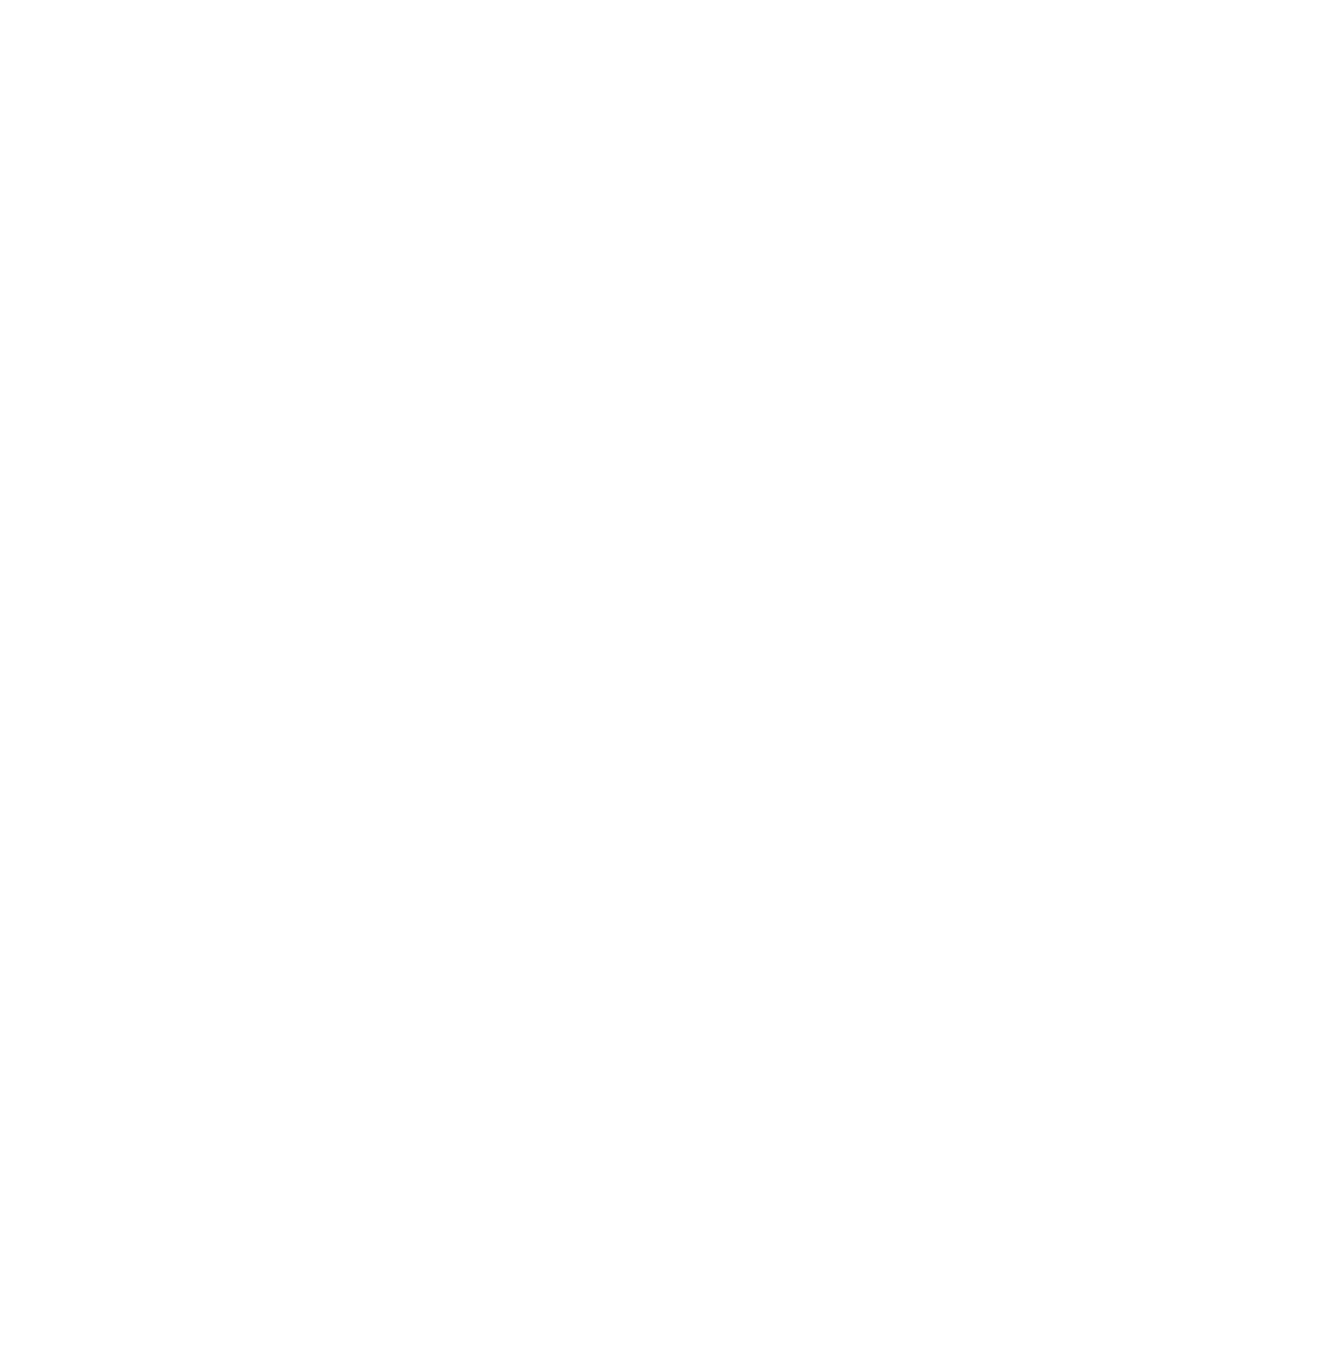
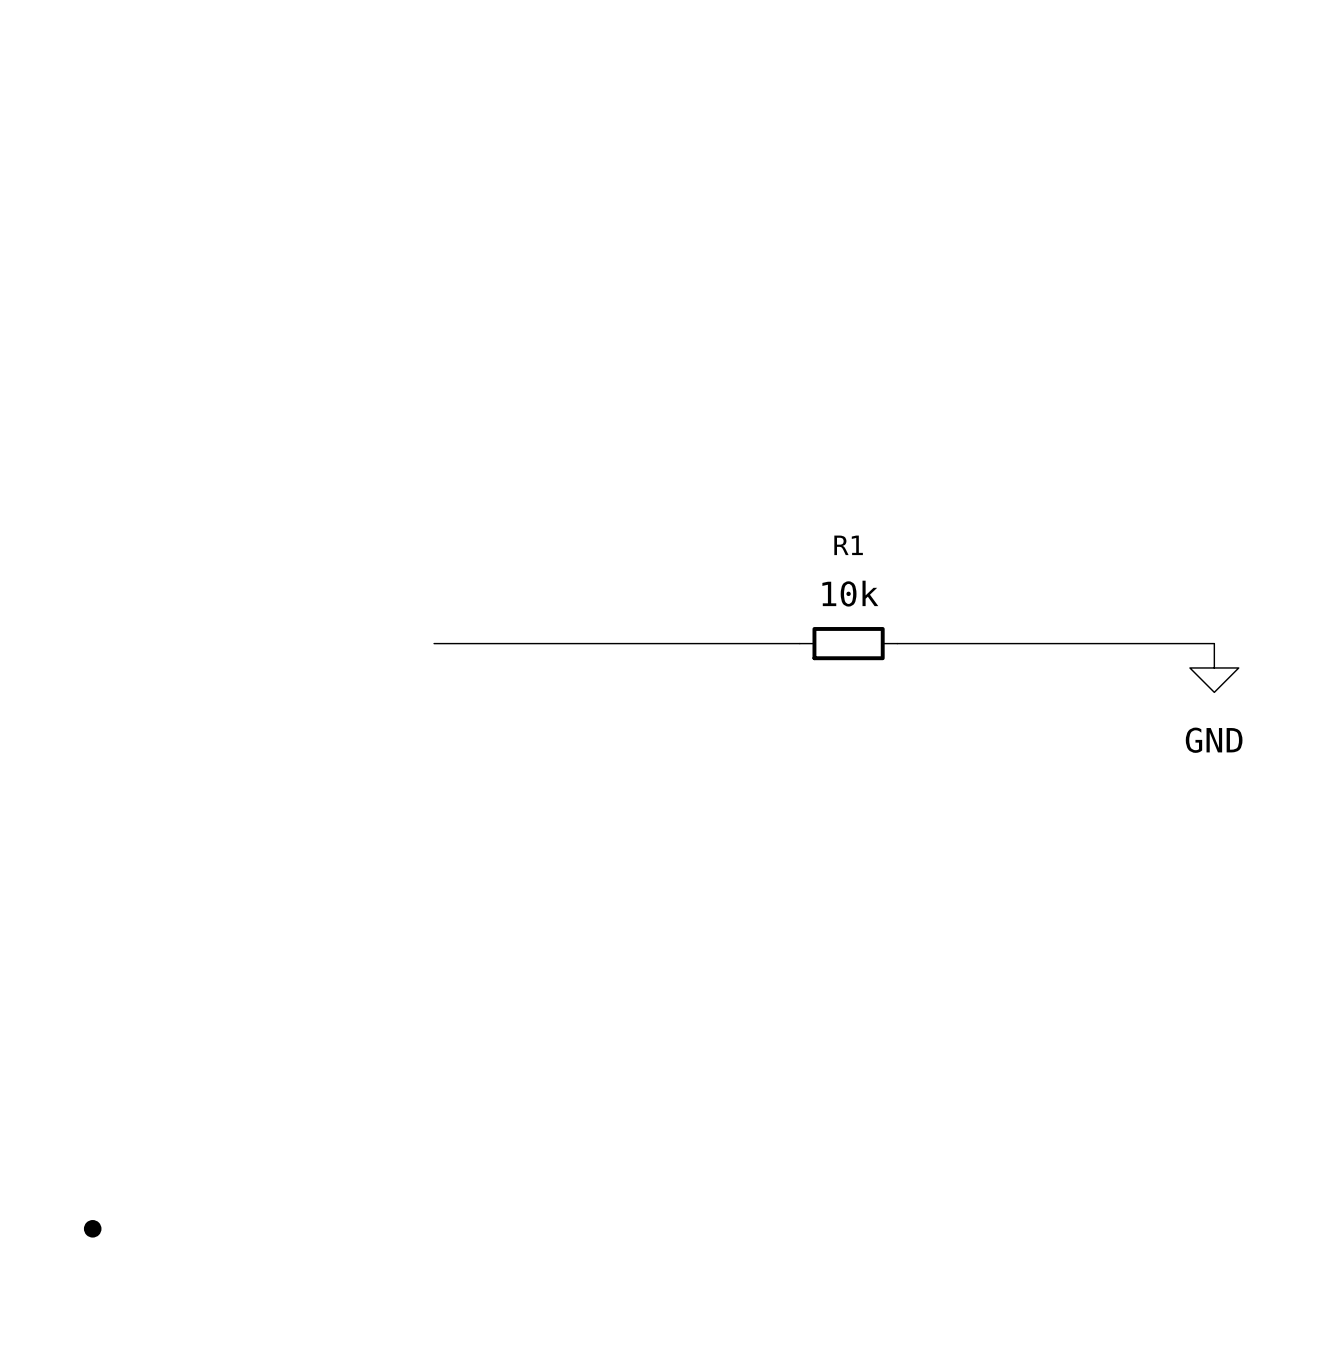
wire: none -> (434, 643) (799, 643)
R1: none -> 10k (848, 643)
wire: none -> (897, 643) (1214, 643)
power symbol: none -> GND (1214, 667)
junction: none -> (92, 1228)

